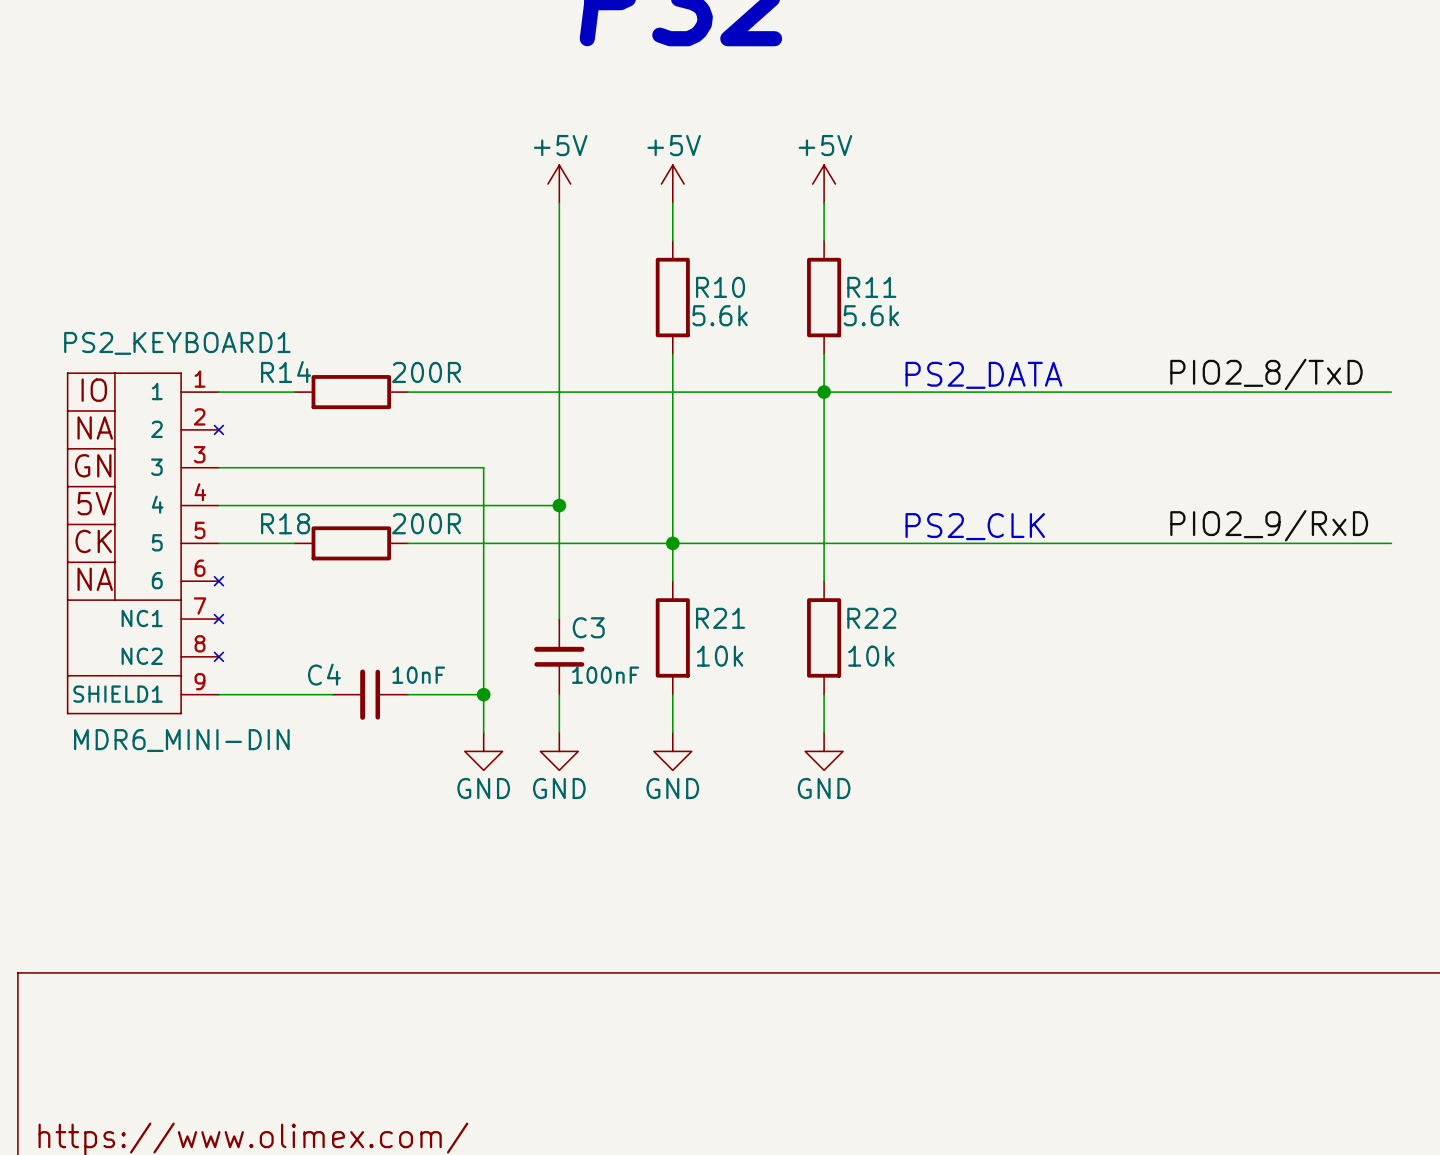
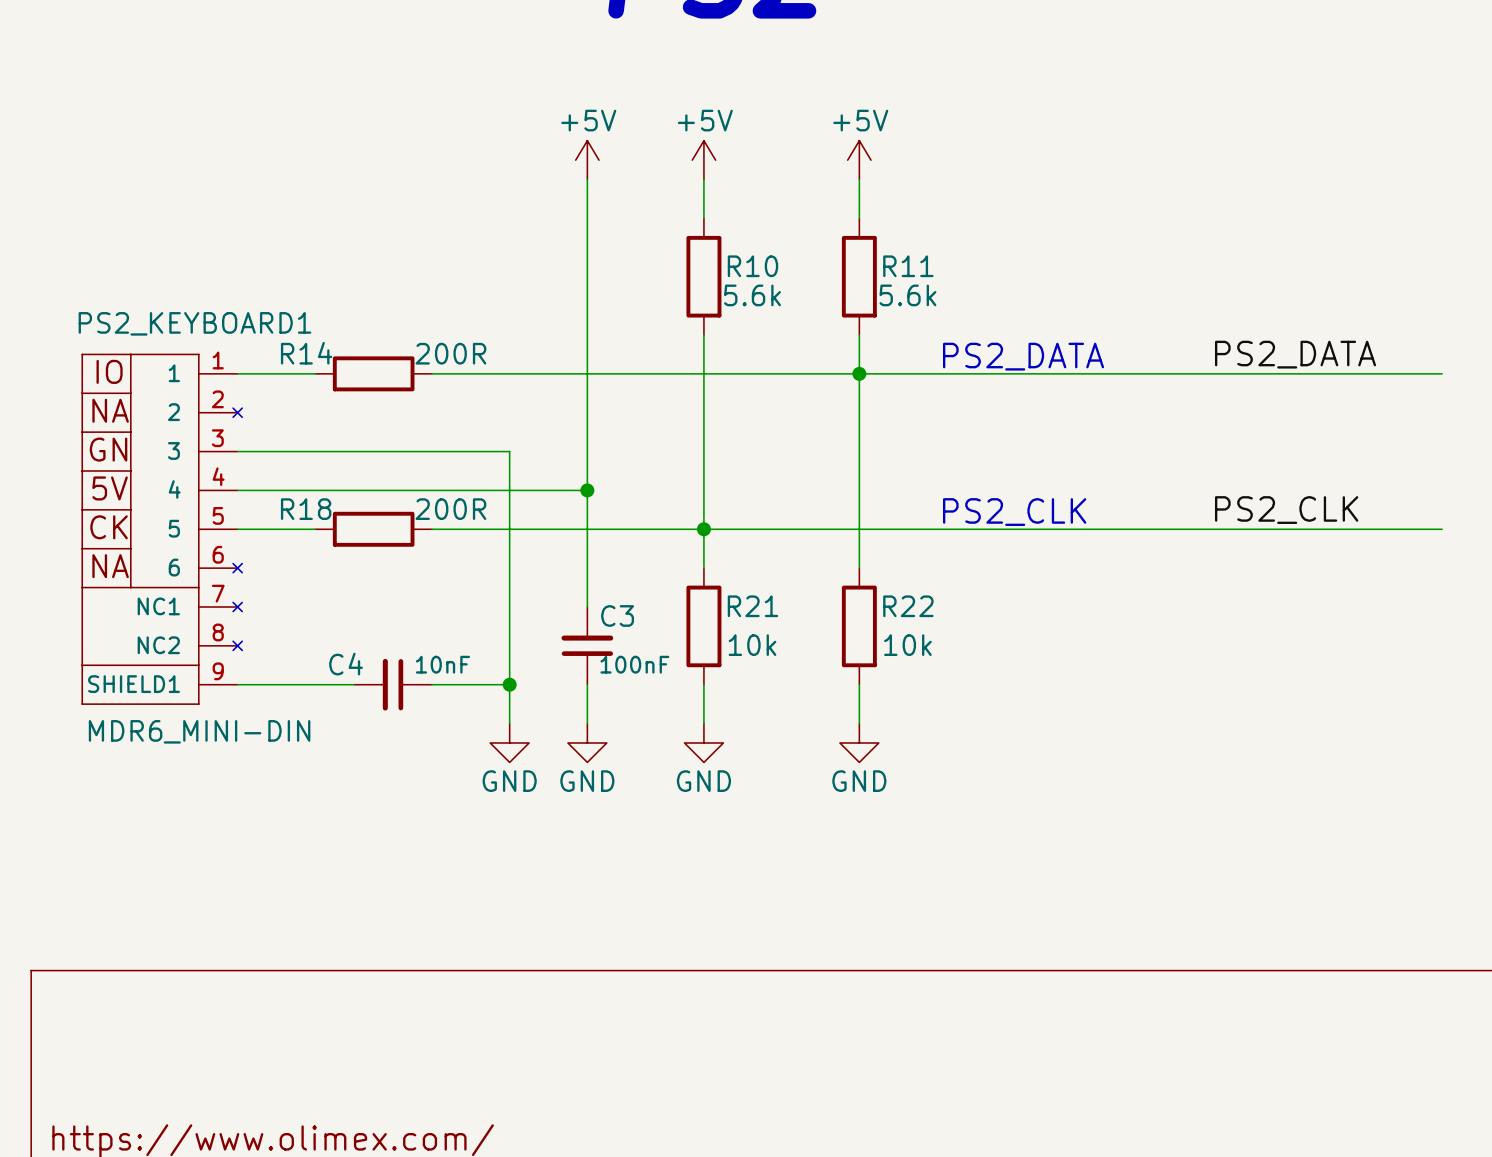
label: PIO2_8/TxD (1266, 374) -> PS2_DATA (1295, 354)
label: PIO2_9/RxD (1269, 525) -> PS2_CLK (1286, 510)

